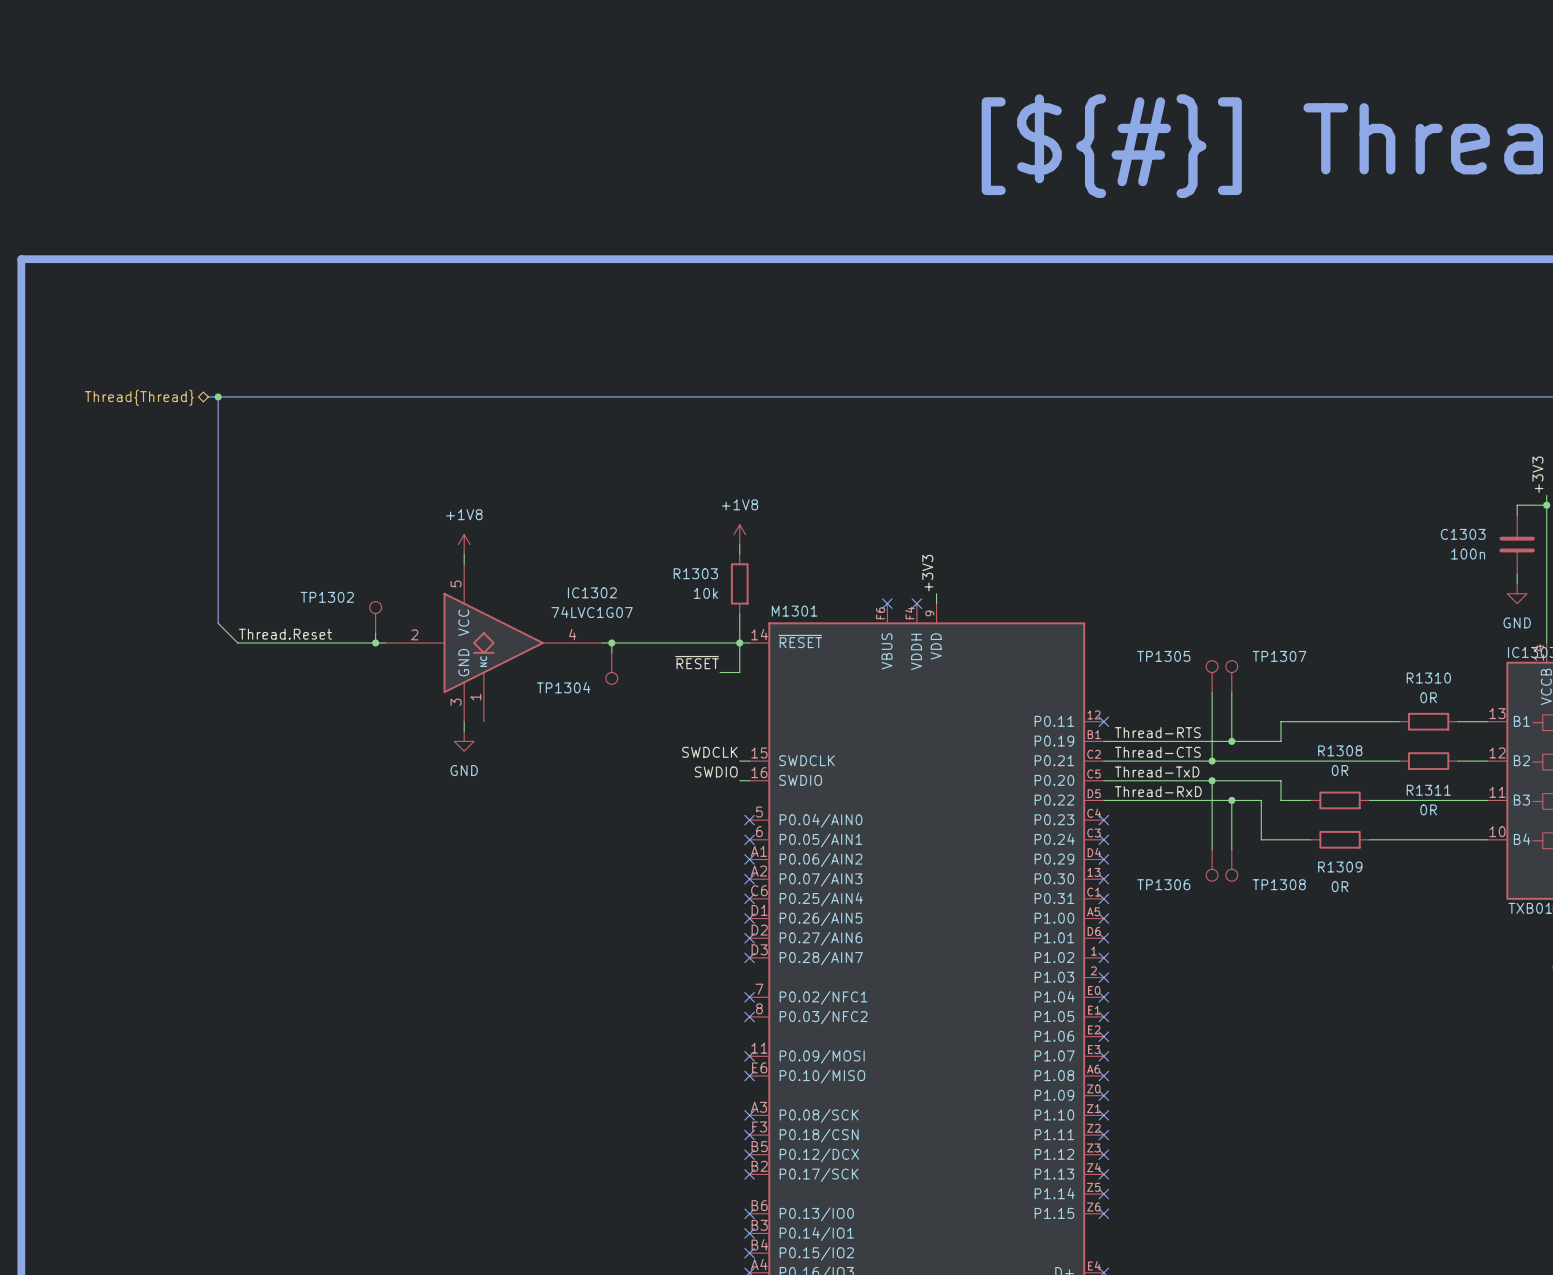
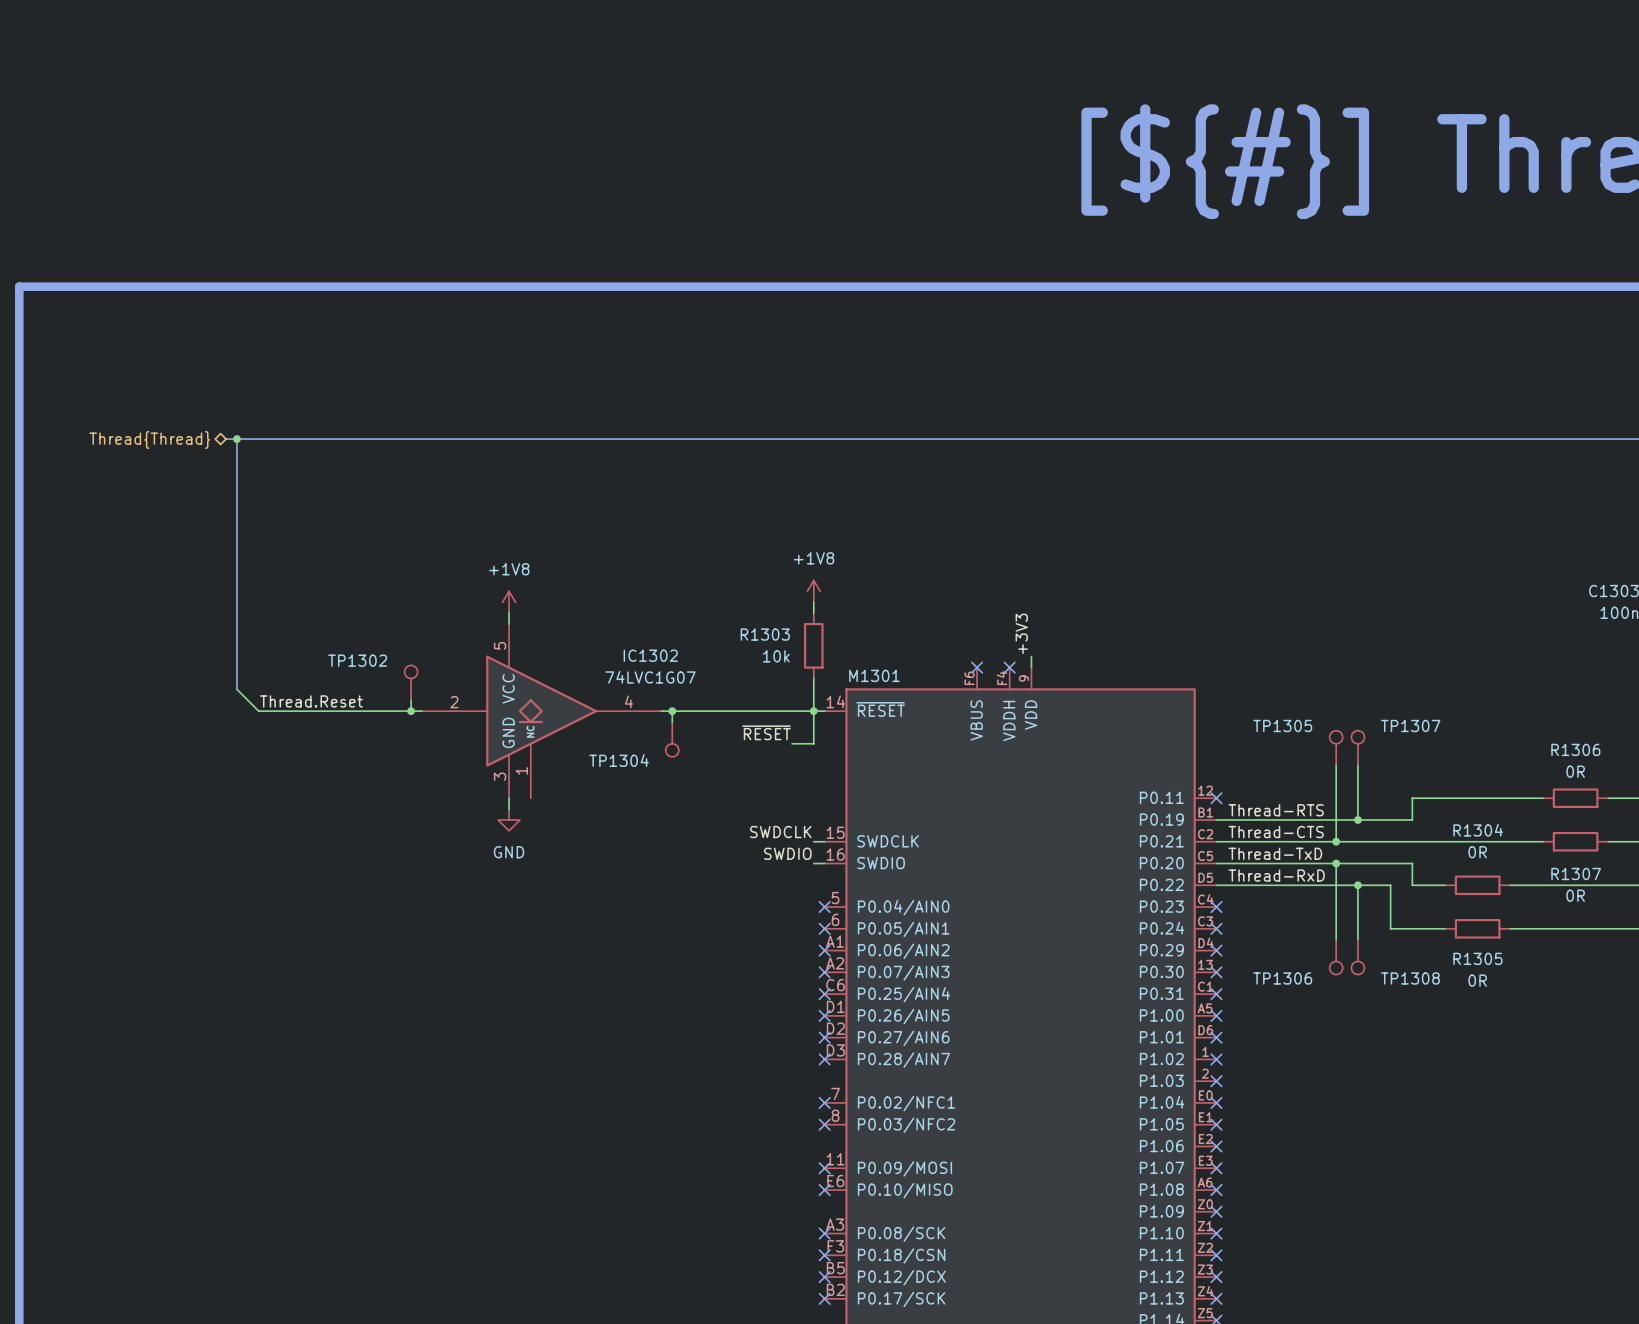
R1310 name: R1310 (1428, 678) -> R1306 (1575, 749)
R1308 name: R1308 (1340, 750) -> R1304 (1478, 830)
R1311 name: R1311 (1428, 790) -> R1307 (1576, 873)
R1309 name: R1309 (1340, 867) -> R1305 (1477, 958)

